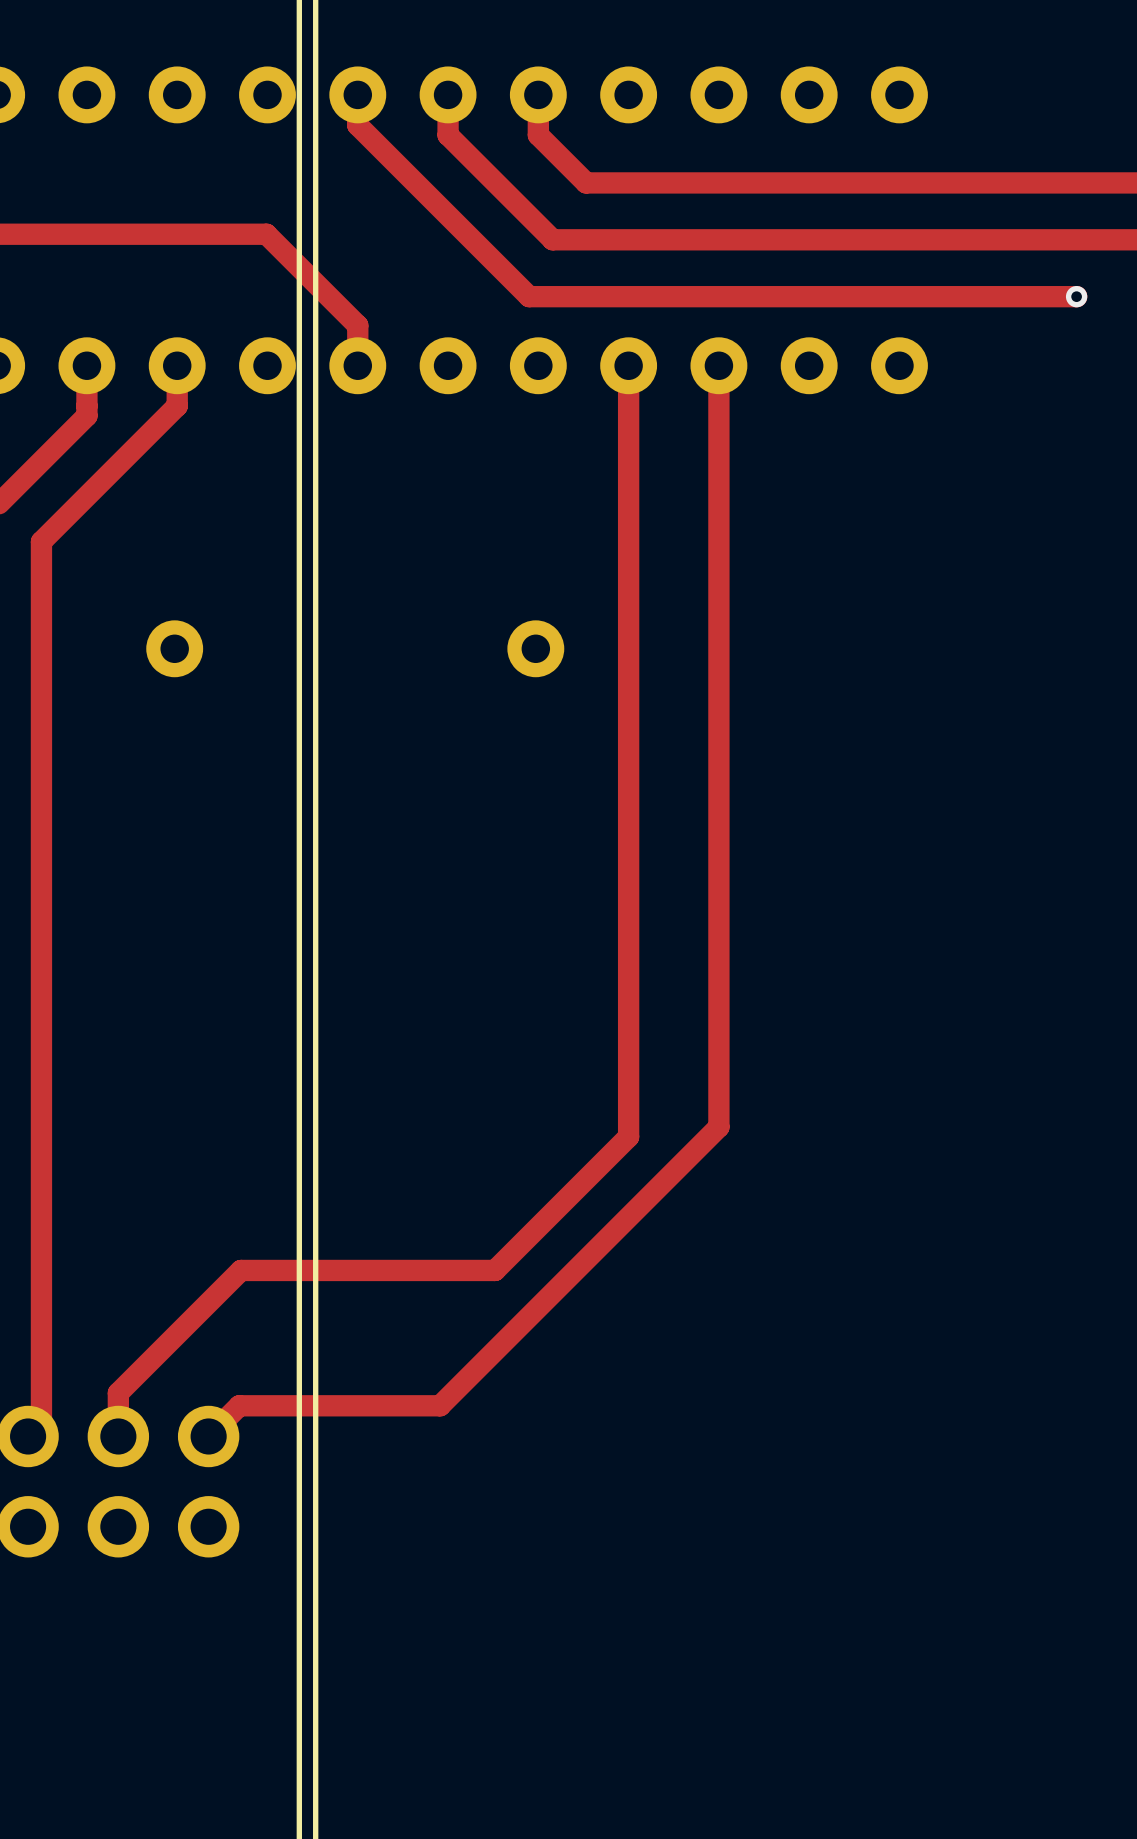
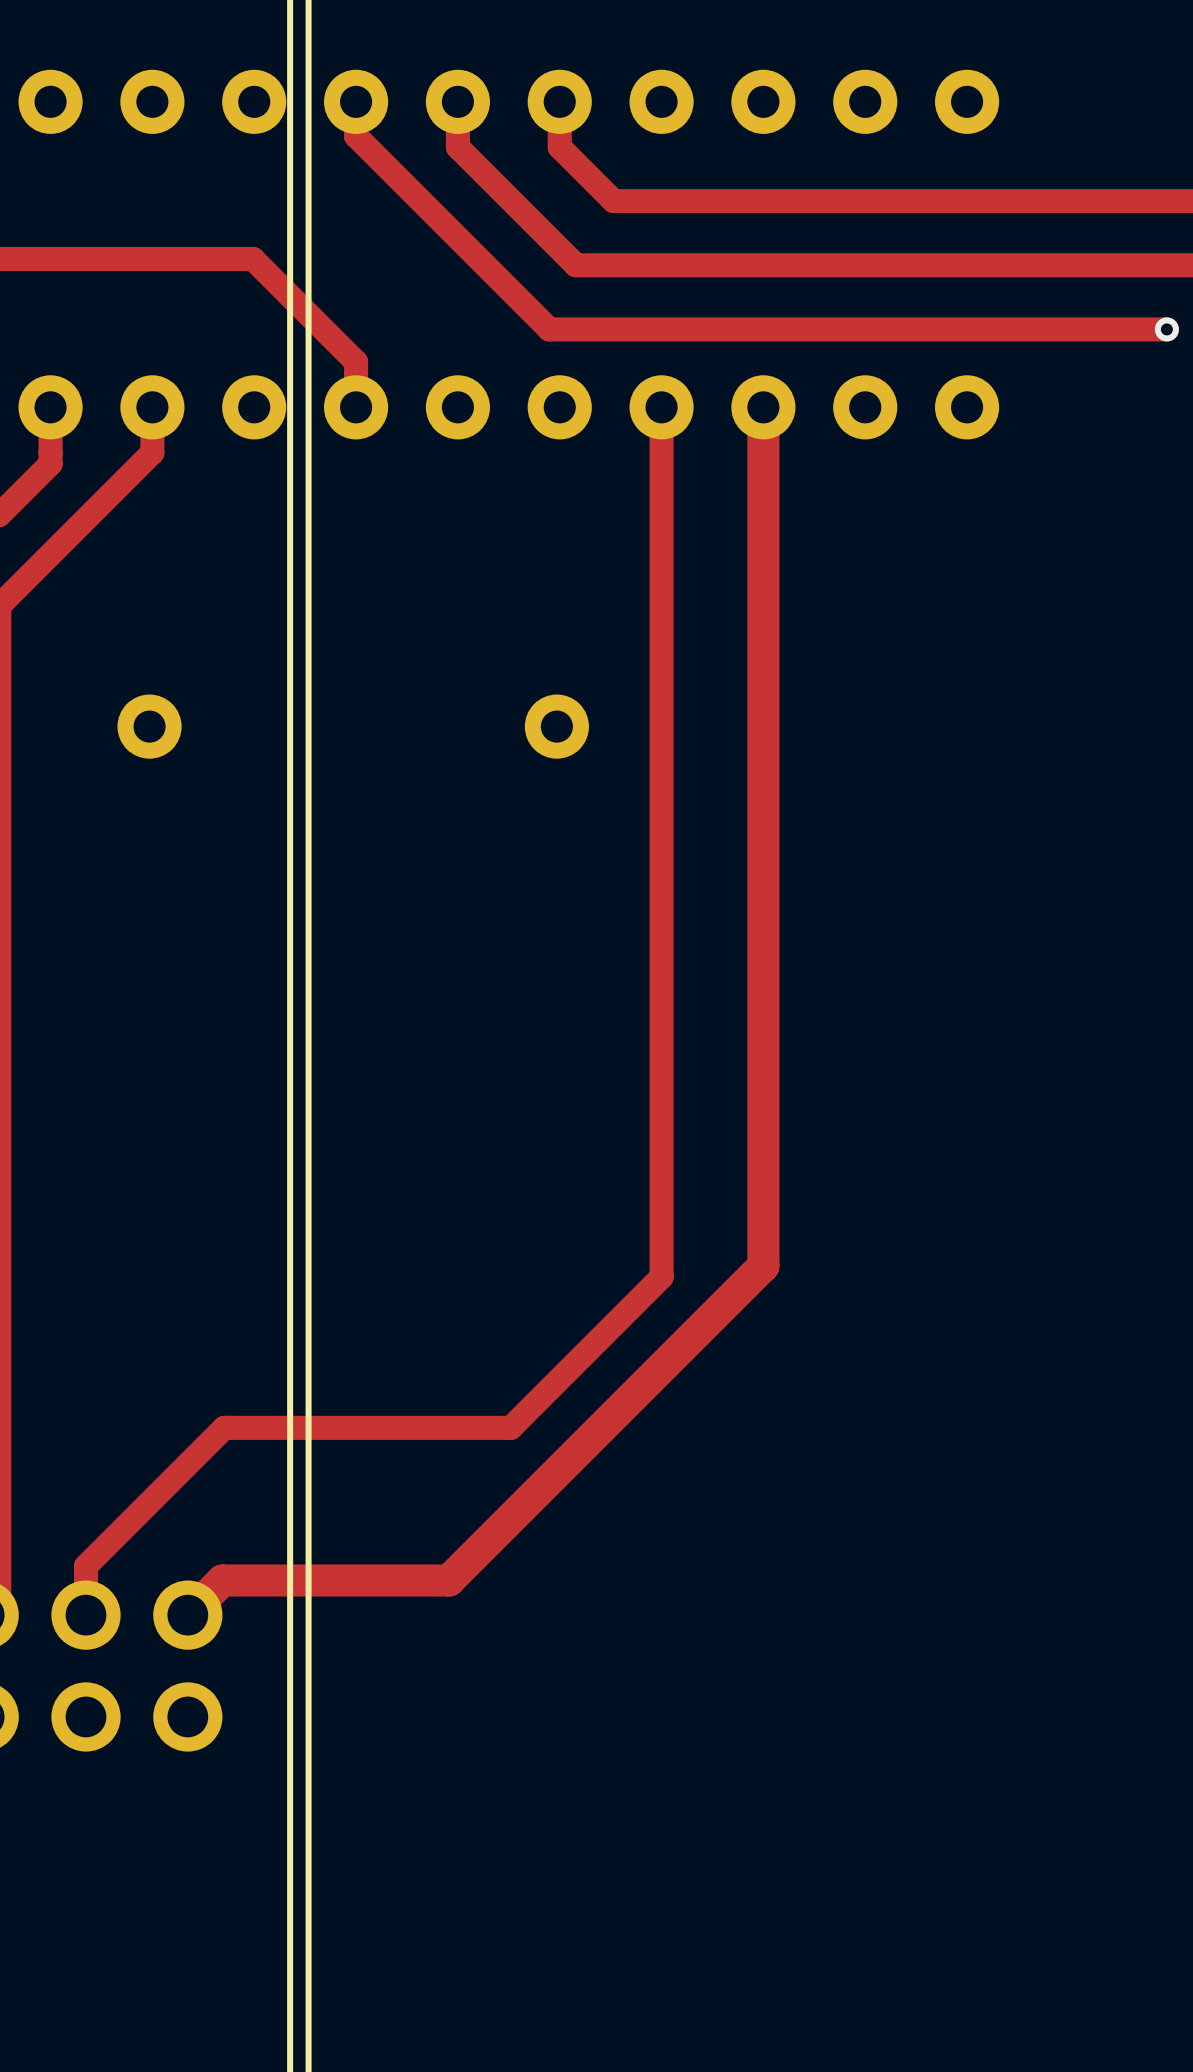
track width: thin (718, 365) (718, 1127) (440, 1405) (239, 1405) (208, 1436) -> thick (763, 407) (763, 1266) (448, 1580) (222, 1580) (187, 1615)

